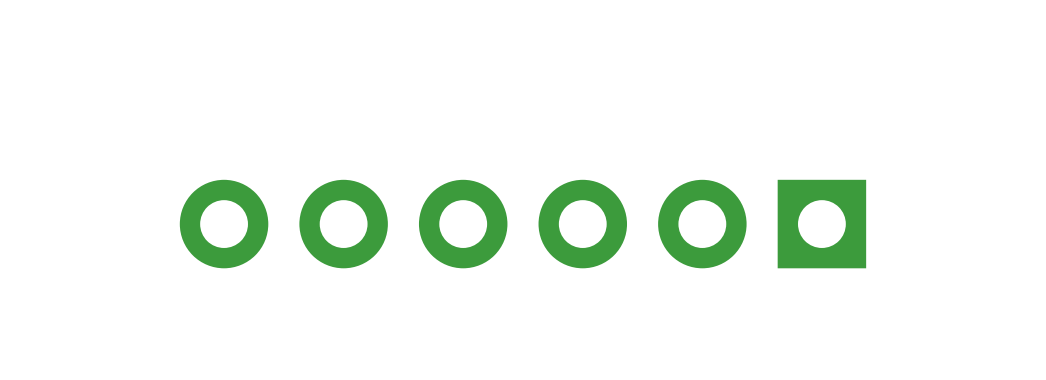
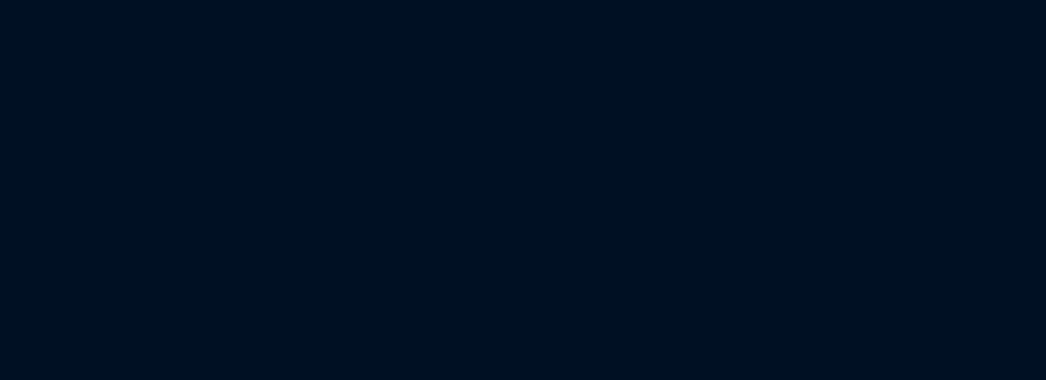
part: (522, 224) -> none

